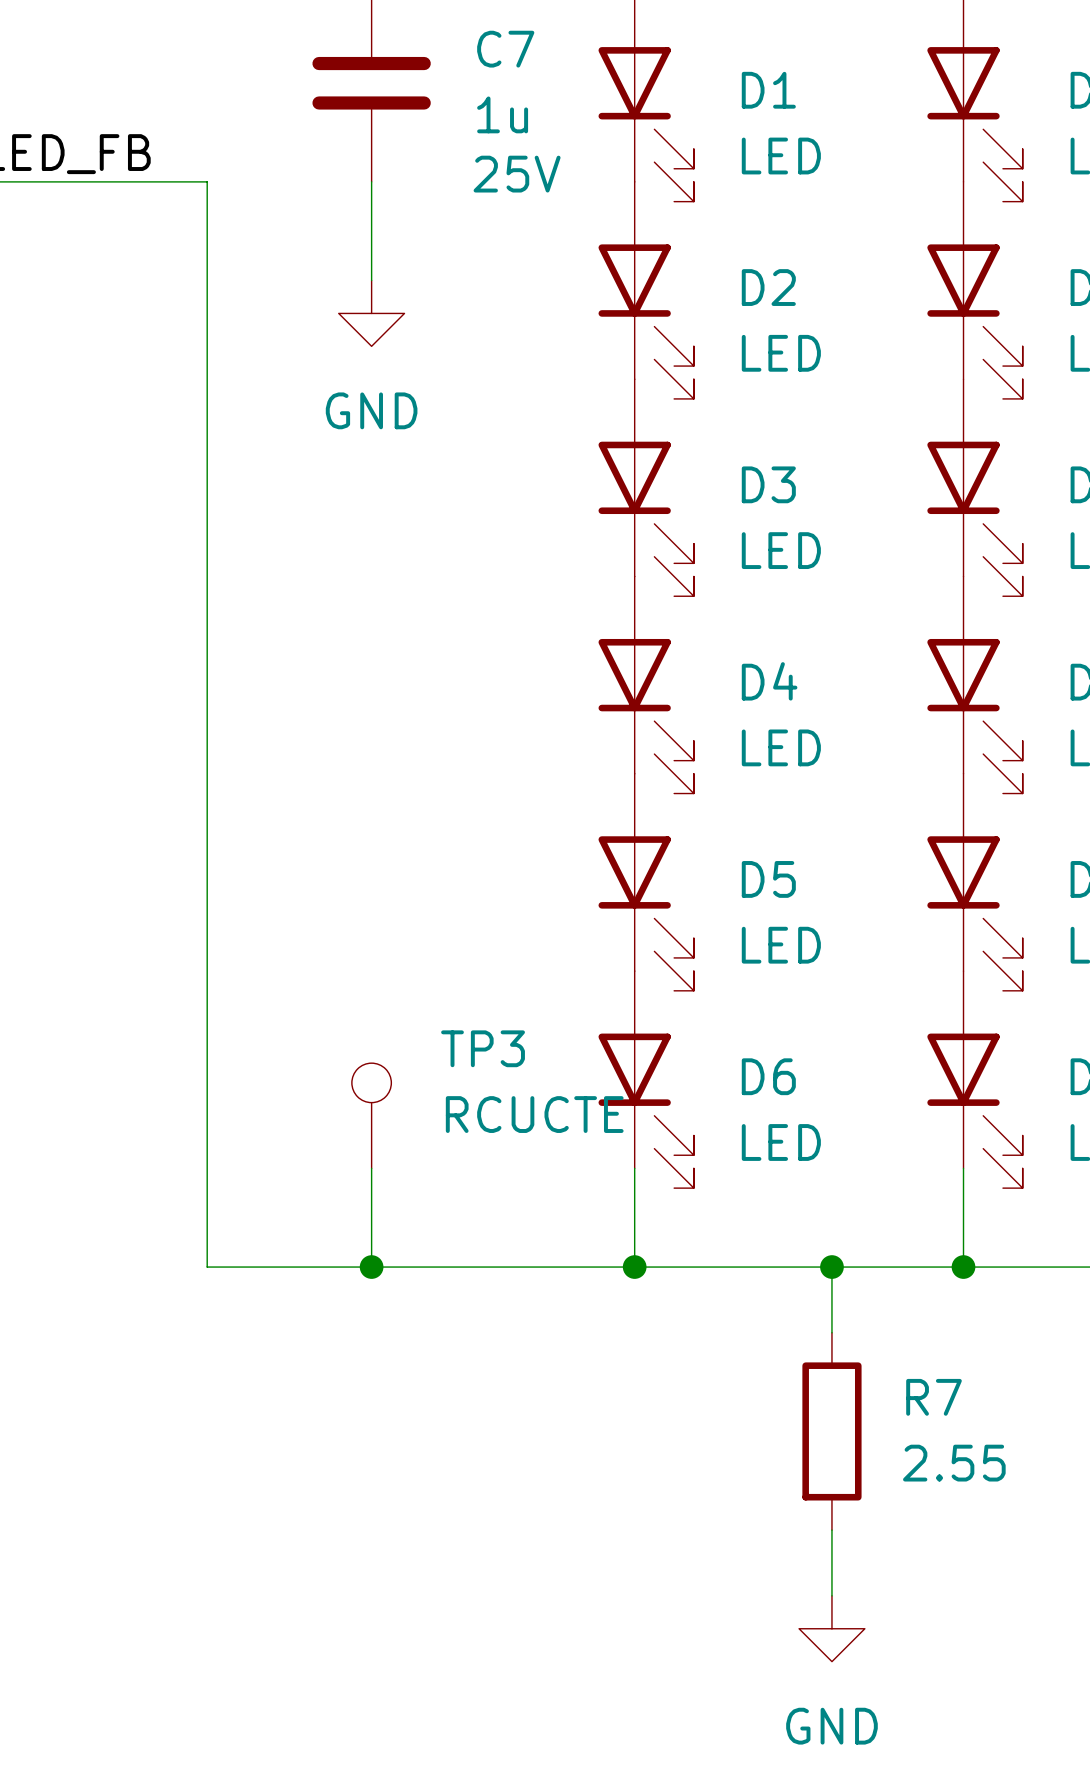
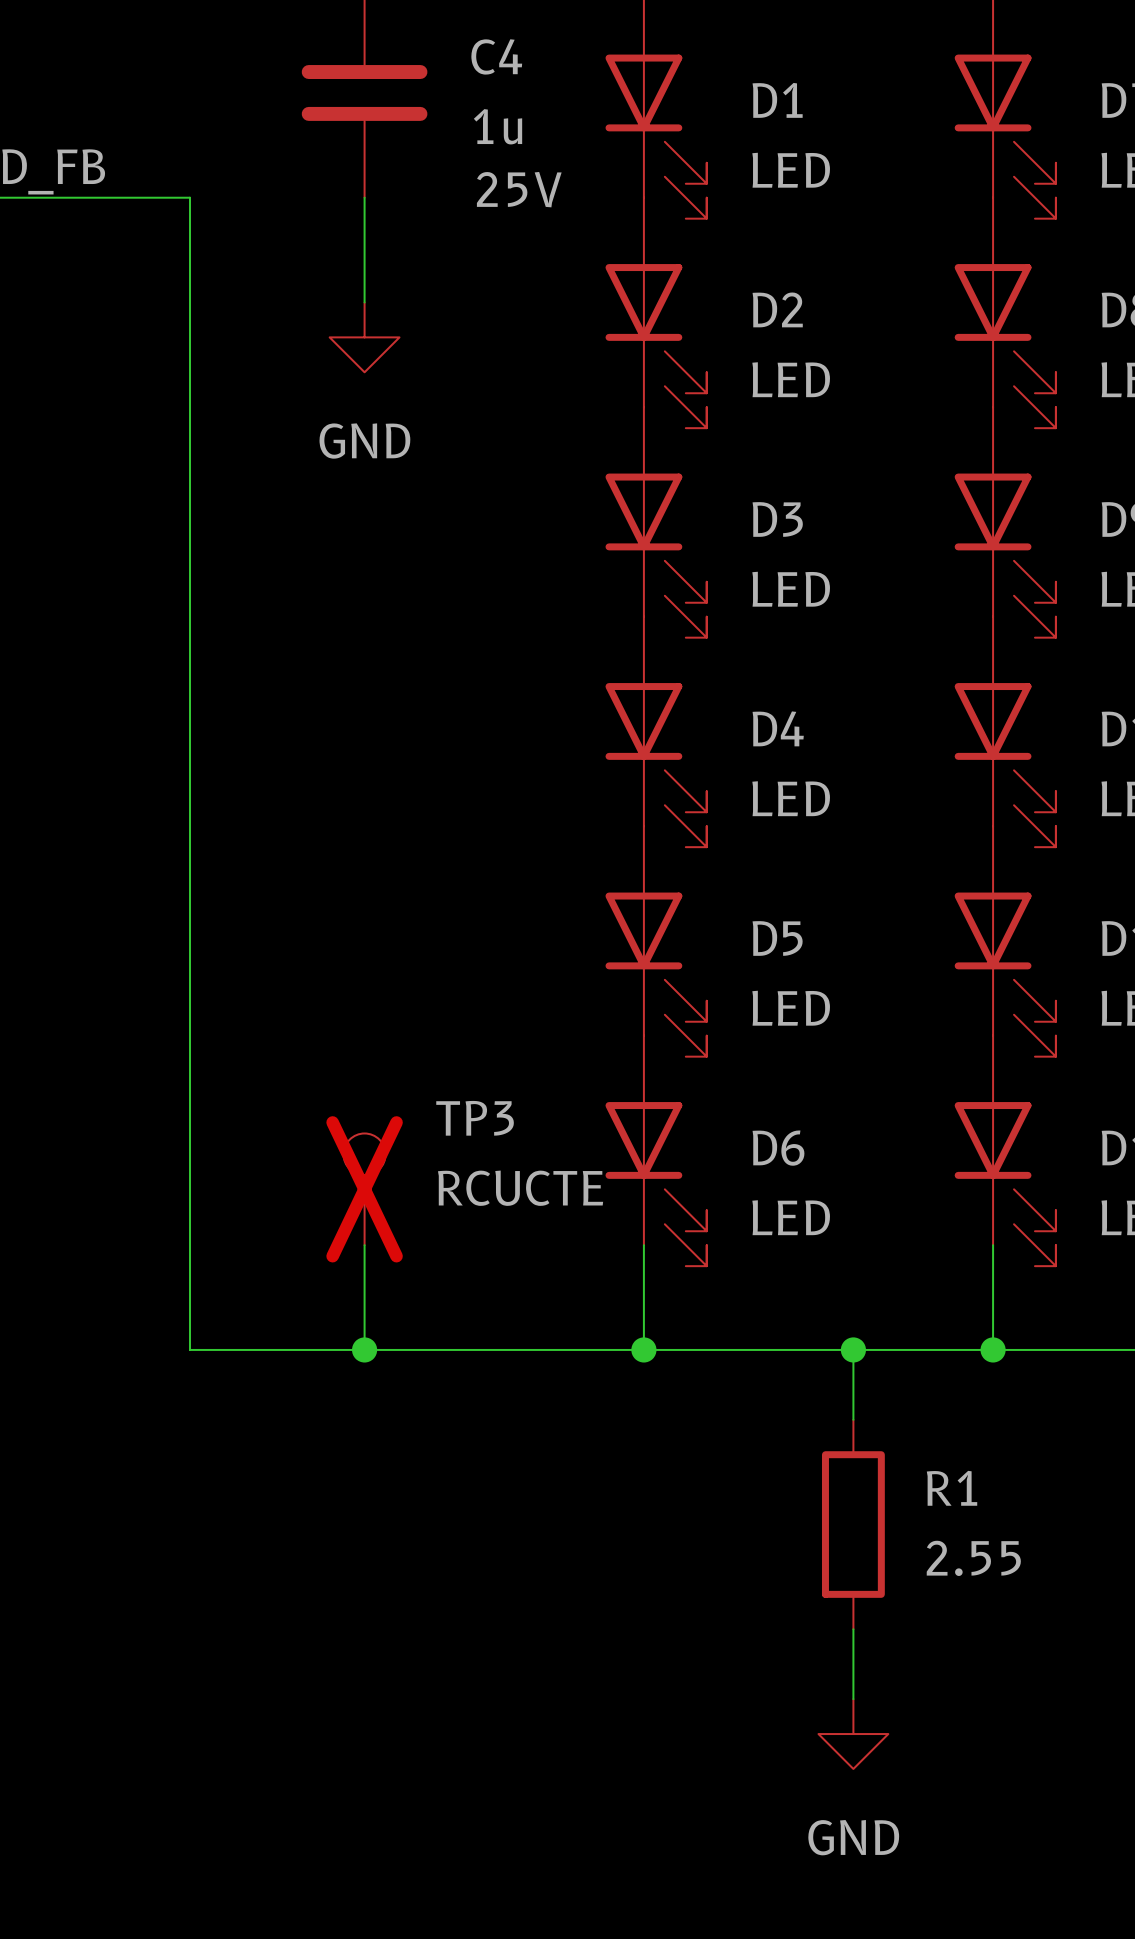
C7 name: C7 (505, 49) -> C4 (496, 56)
TP3 do-not-place cross: none -> (364, 1189)
R7 name: R7 (934, 1397) -> R1 (952, 1488)

